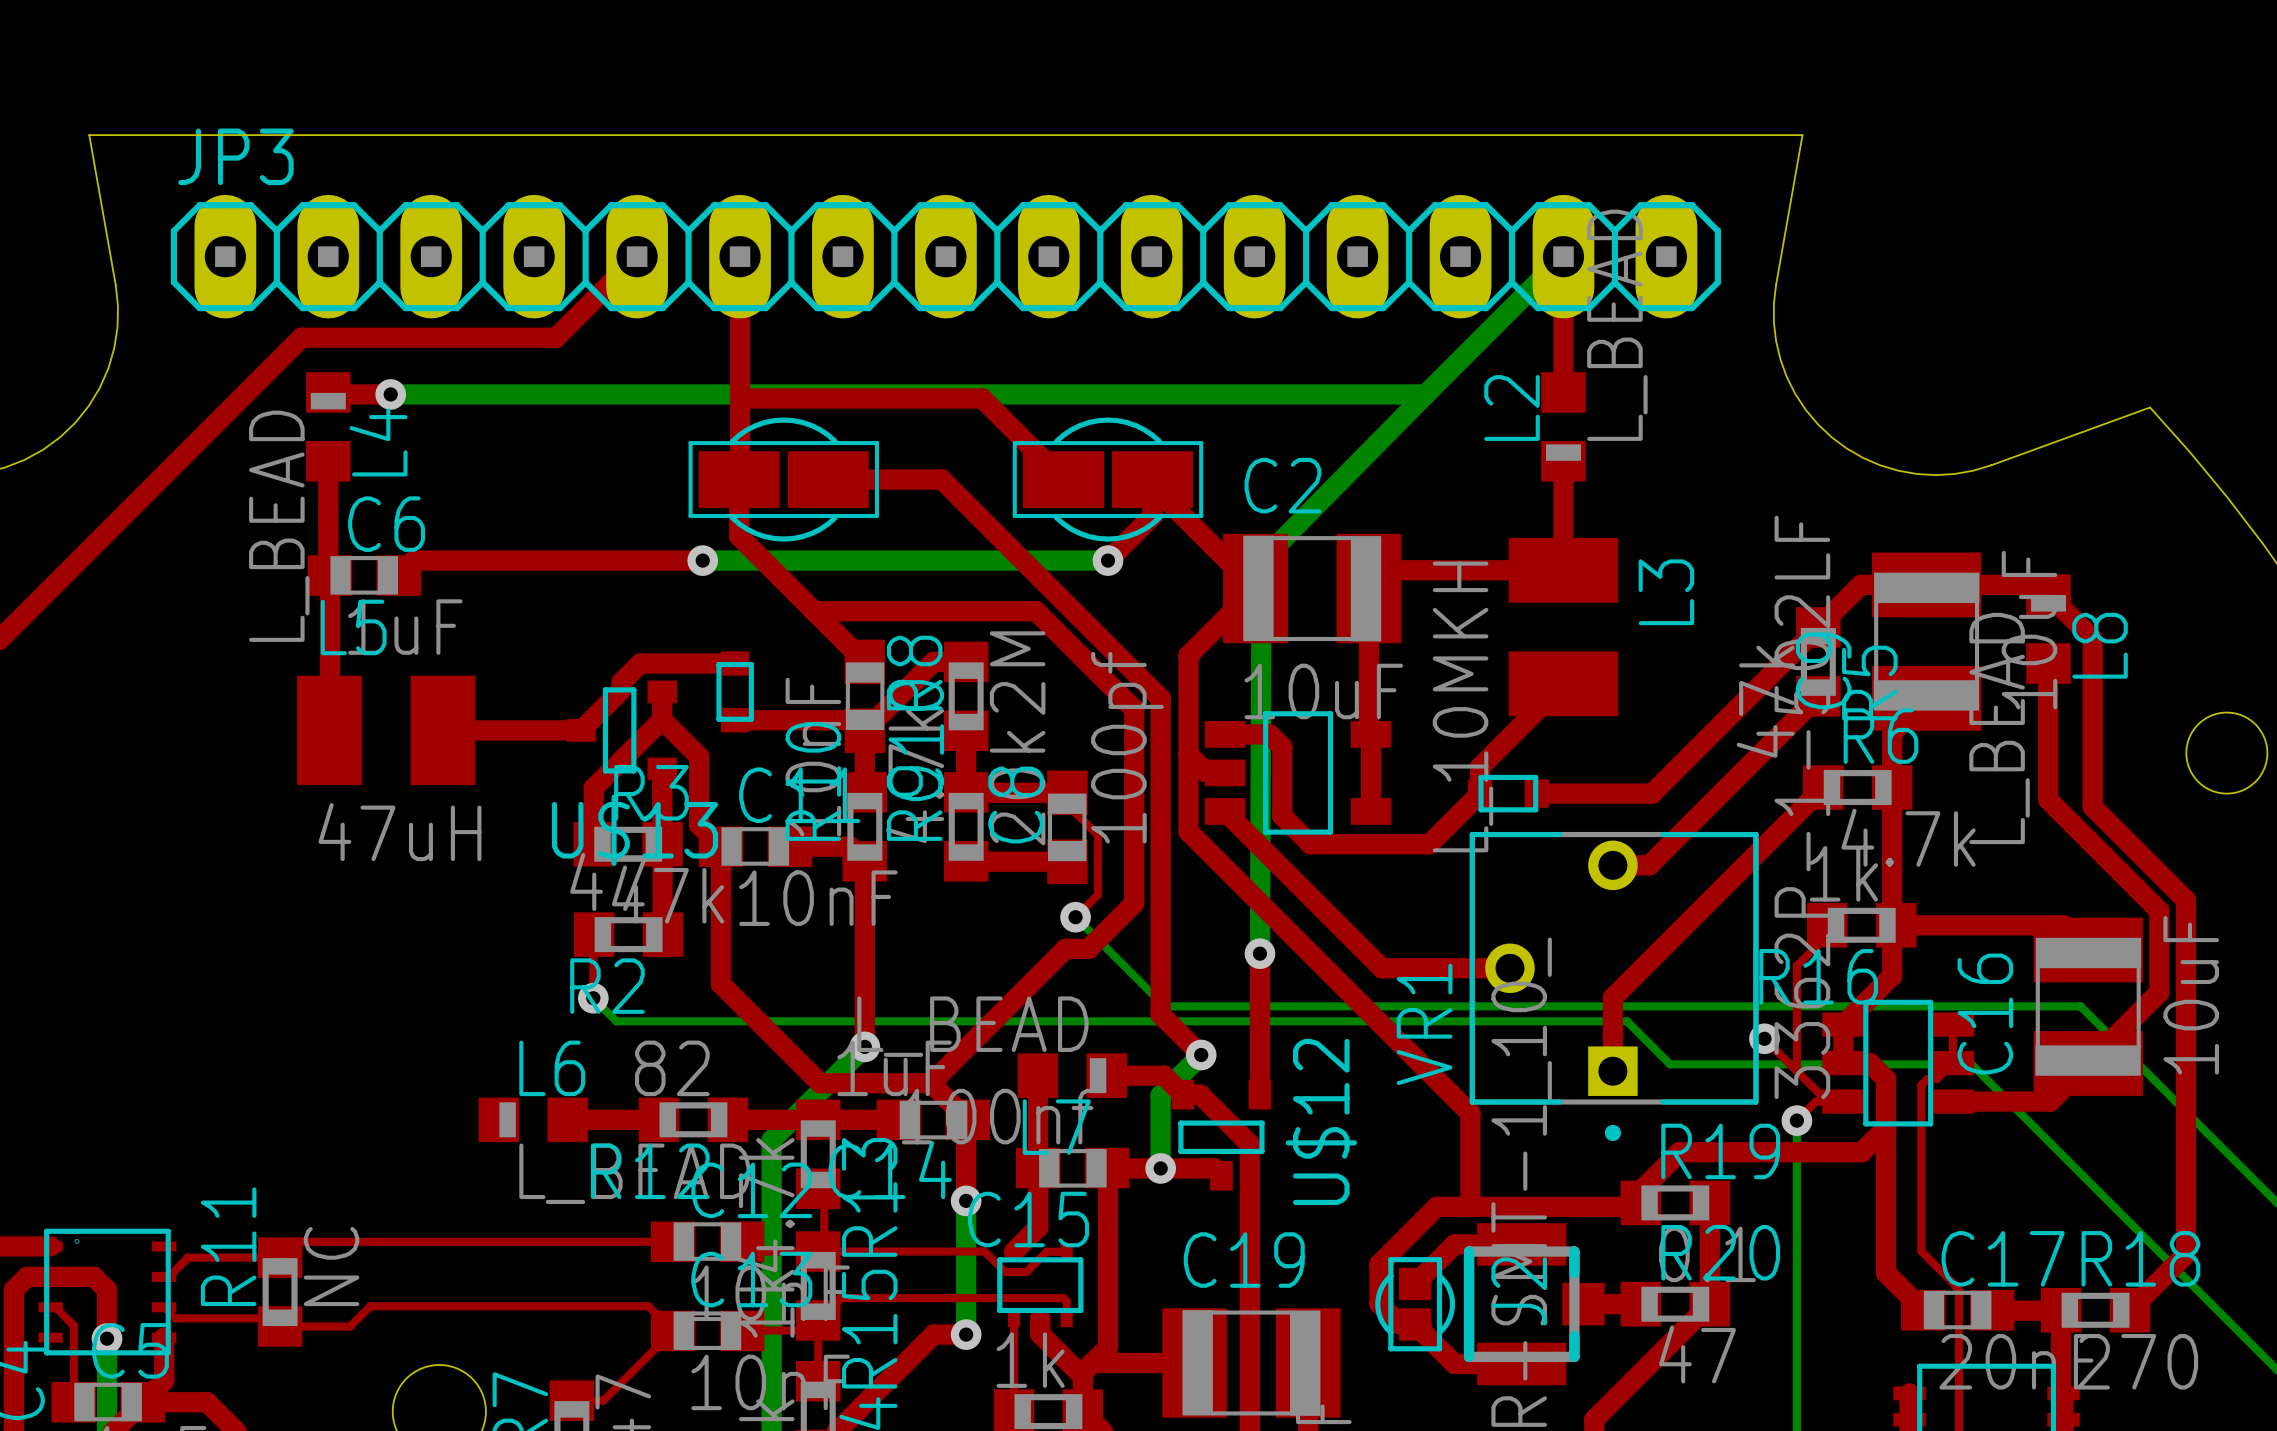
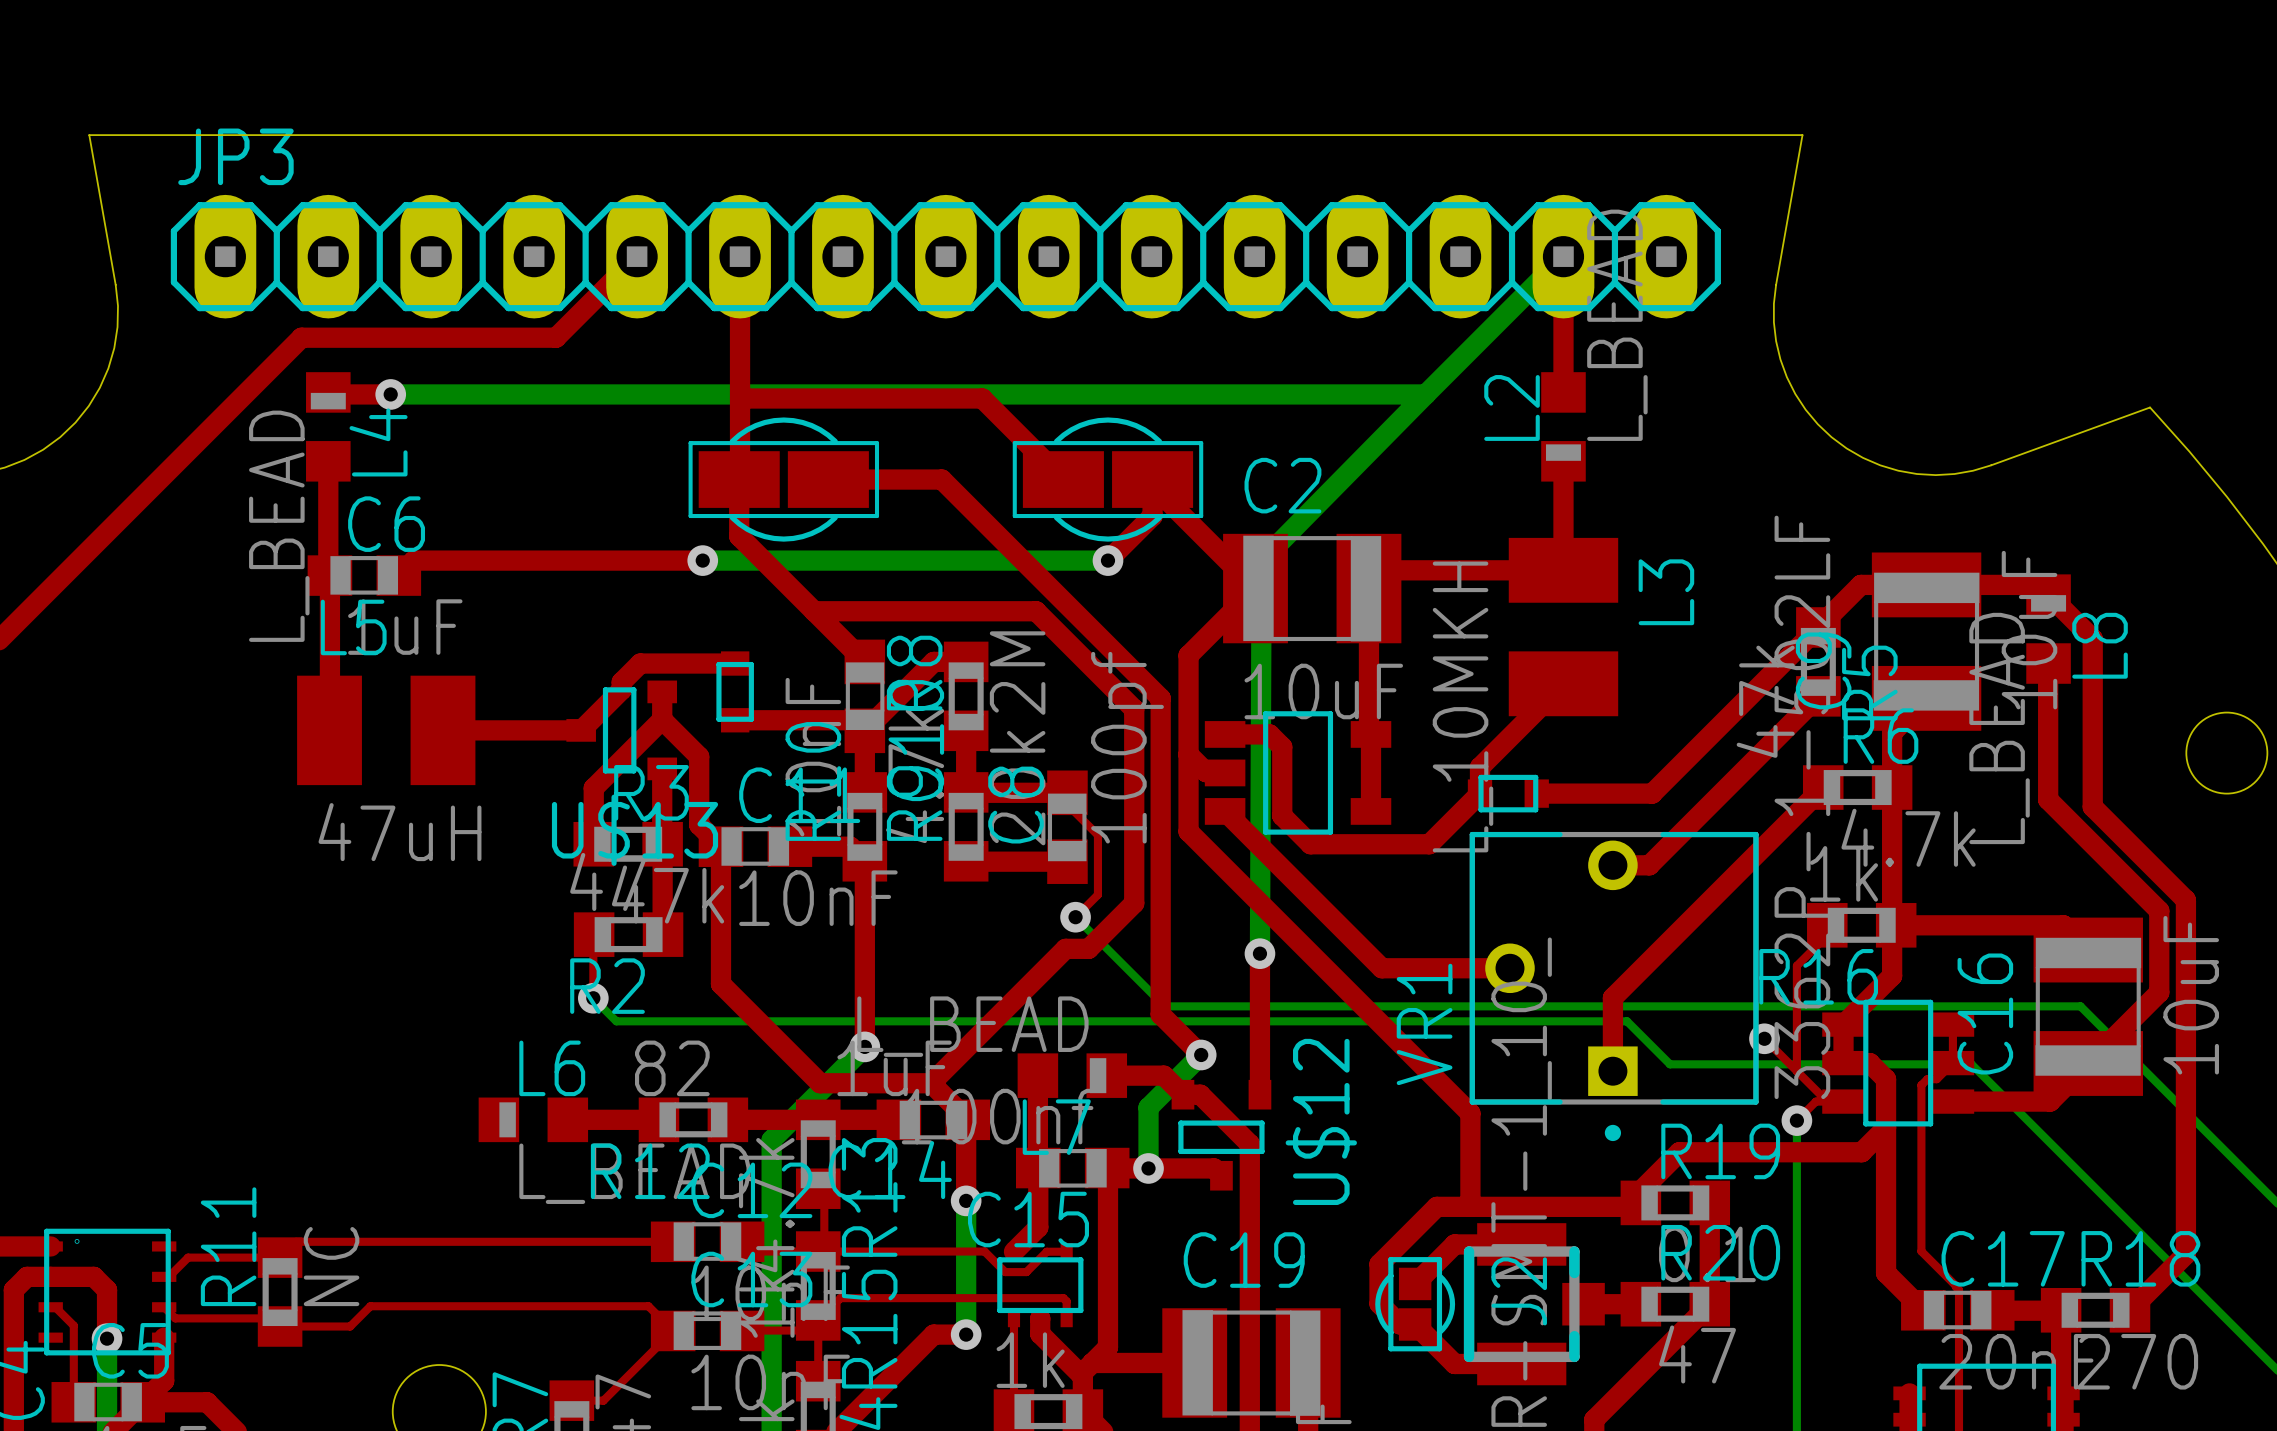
bottom track: (1160, 1095) (1160, 1168) -> (1160, 1095) (1148, 1107) (1148, 1168)
via position: (1160, 1168) -> (1148, 1168)

